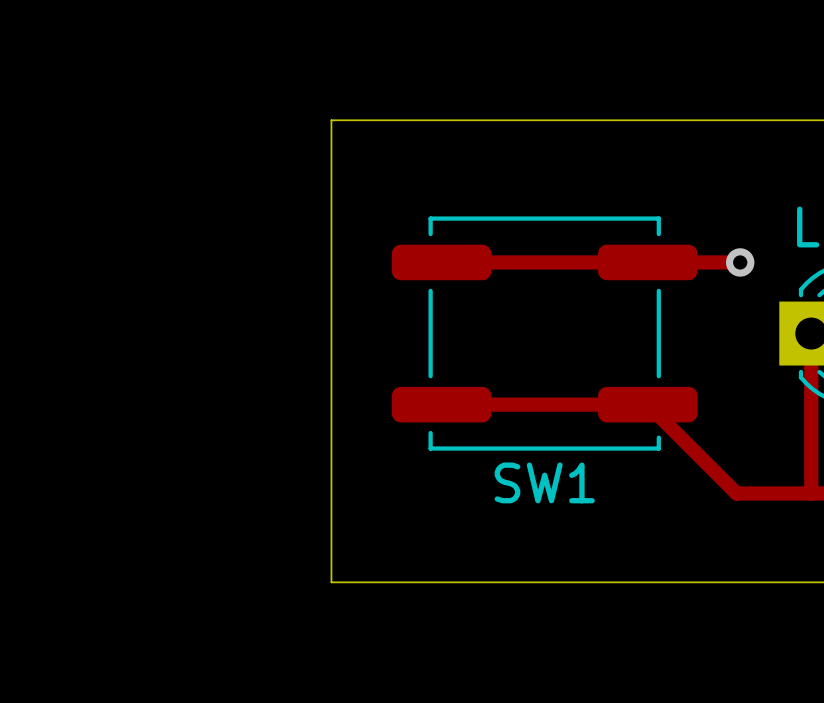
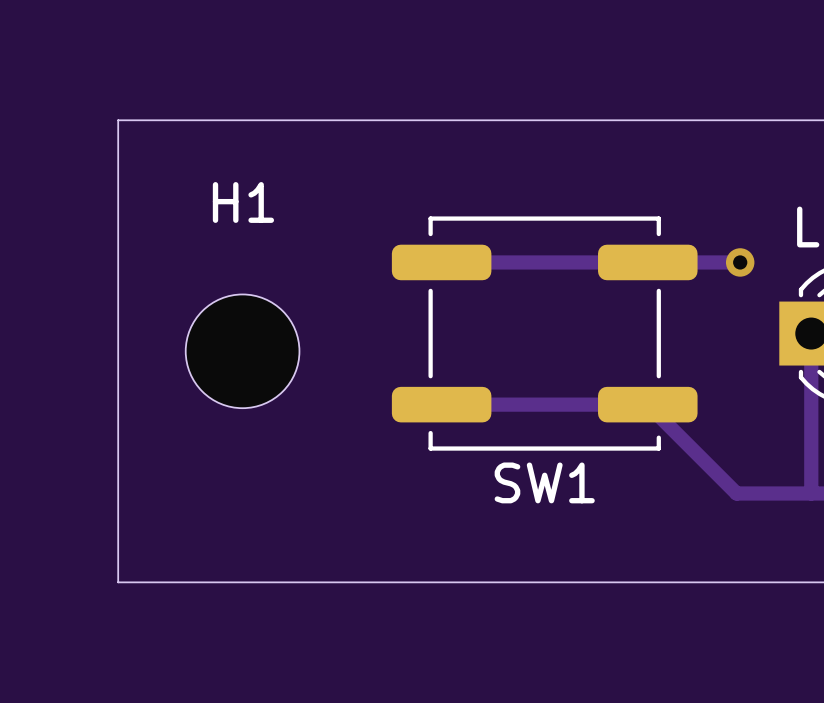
board edge: (331, 120) (331, 582) -> (331, 120) (118, 120) (118, 582) (331, 582)
H1: none -> (242, 351)

